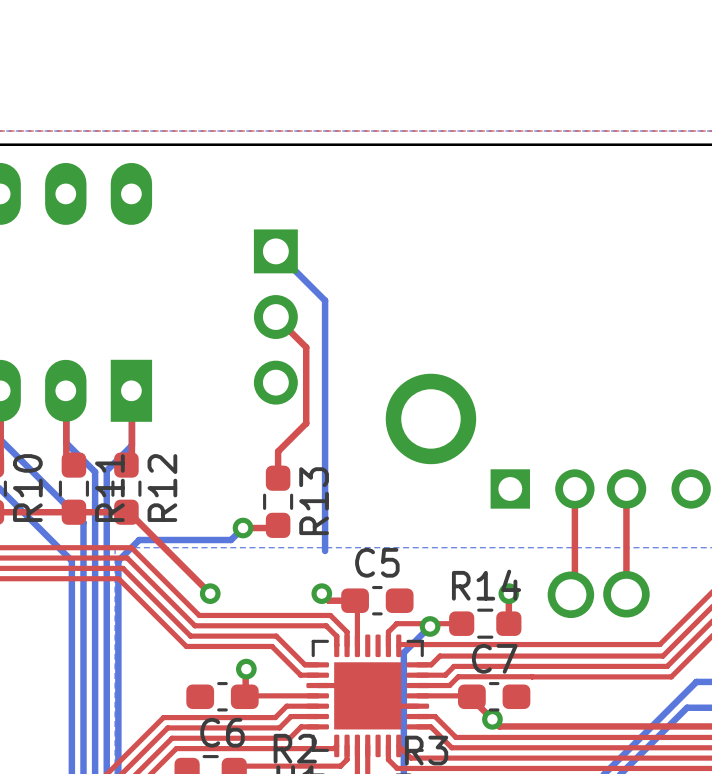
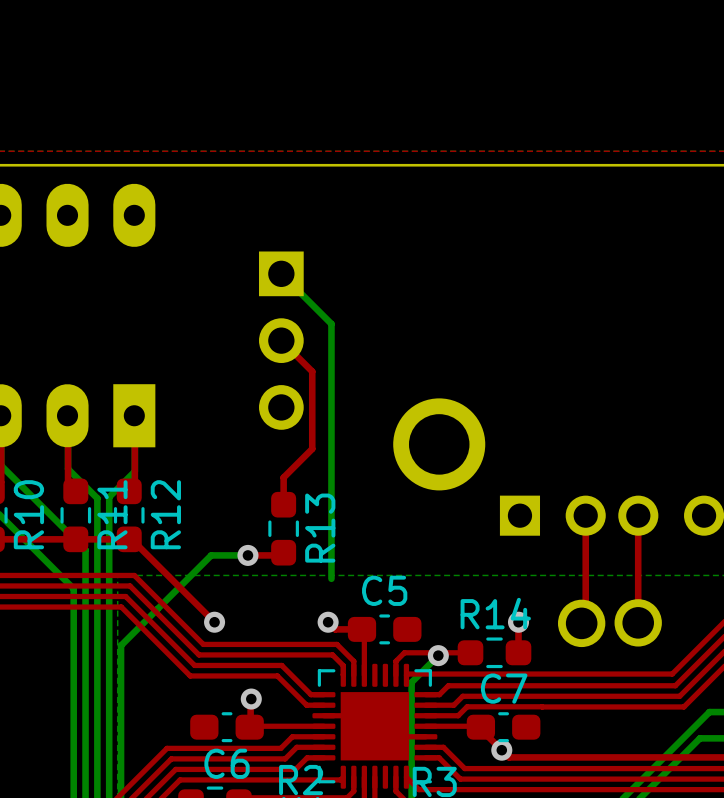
bottom track: (243, 528) (231, 540) (139, 540) (118, 560) (118, 616) -> (247, 555) (211, 555) (121, 645)

